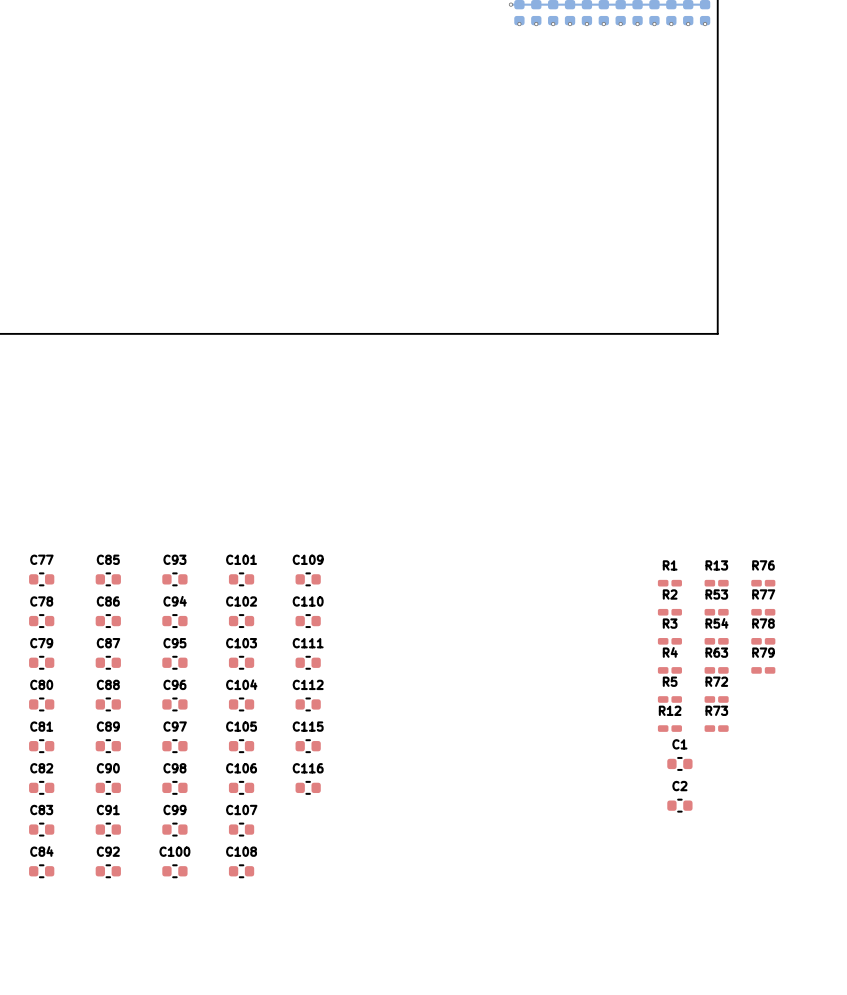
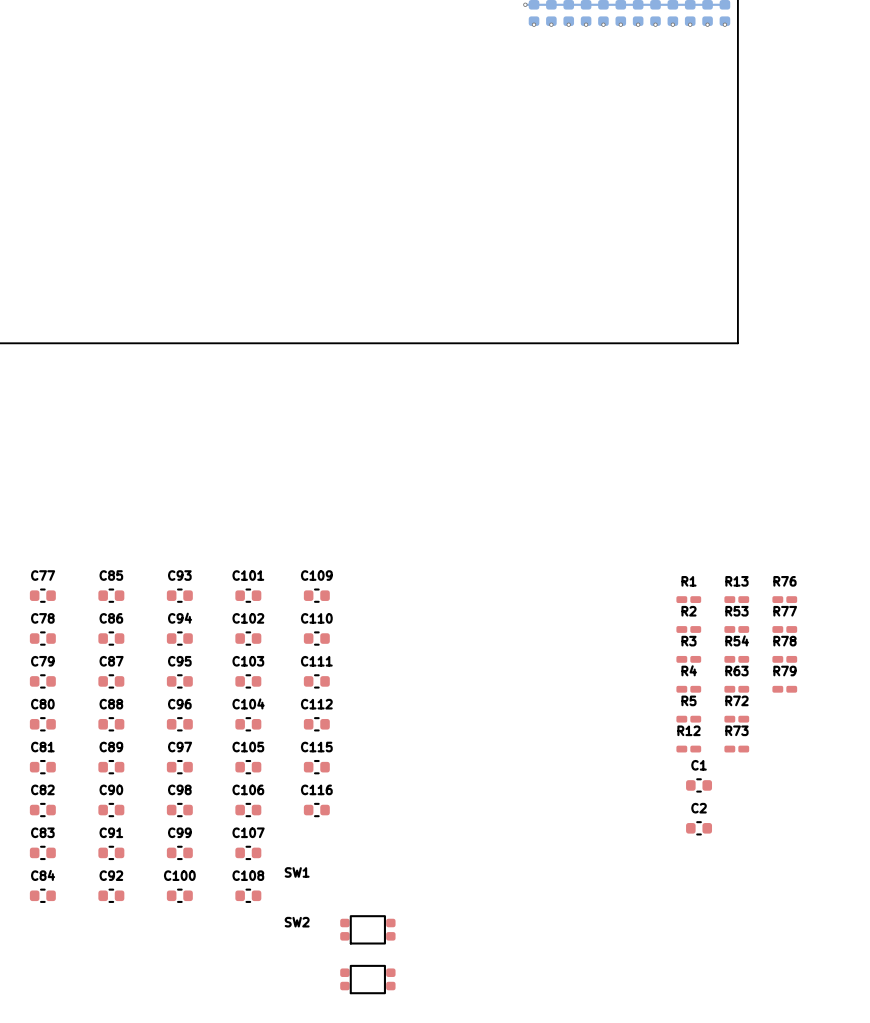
SW1: none -> (367, 929)
SW2: none -> (367, 979)

